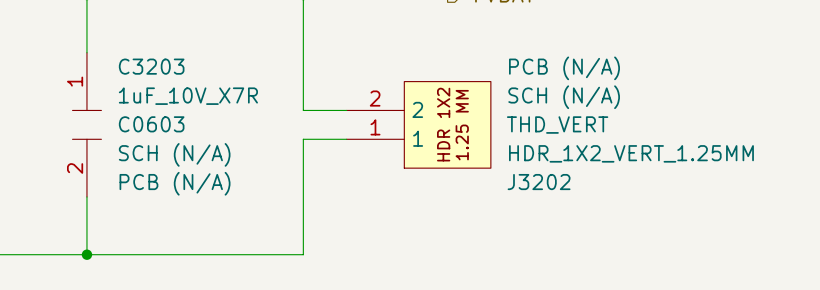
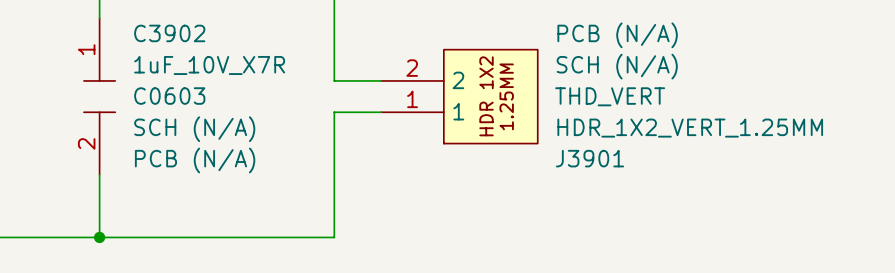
C3203 name: C3203 (151, 66) -> C3902 (169, 33)
J3202 text: 1.25 MM (462, 125) -> 1.25MM (506, 96)
J3202 name: J3202 (539, 182) -> J3901 (590, 158)

